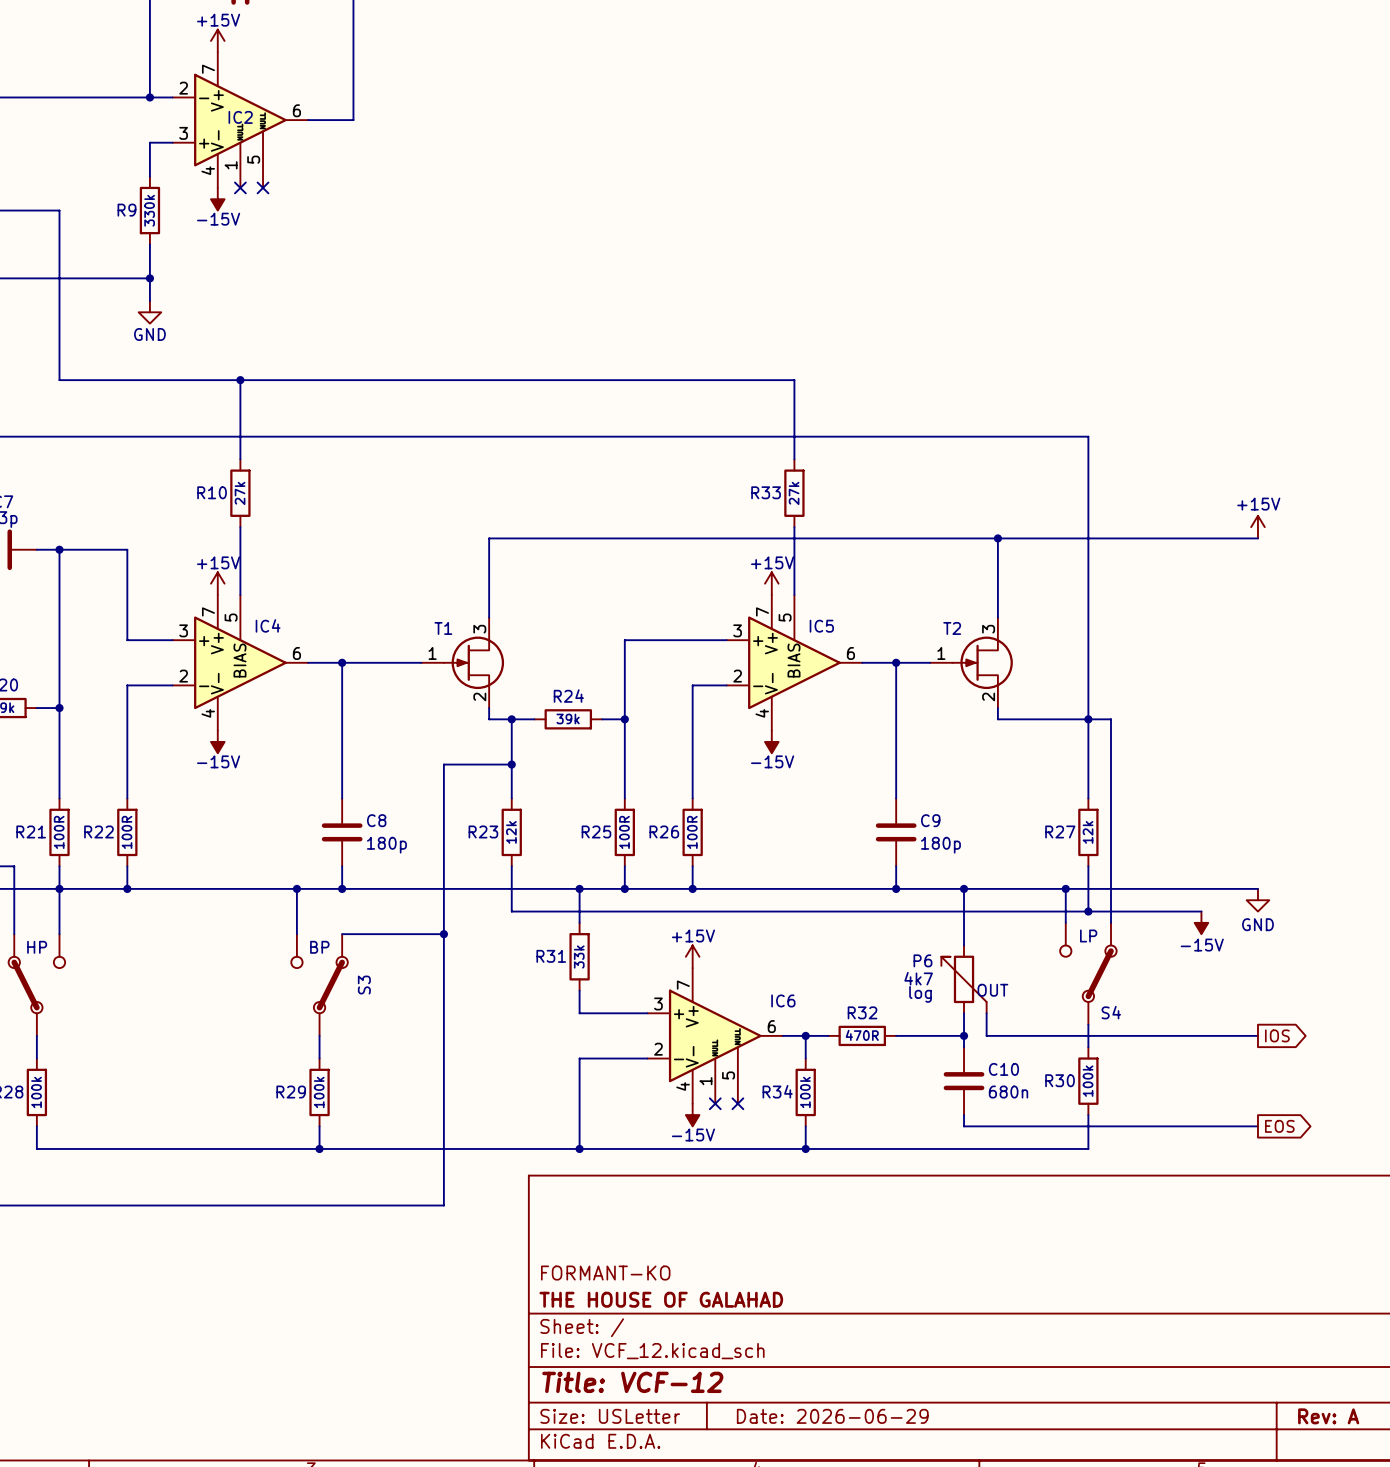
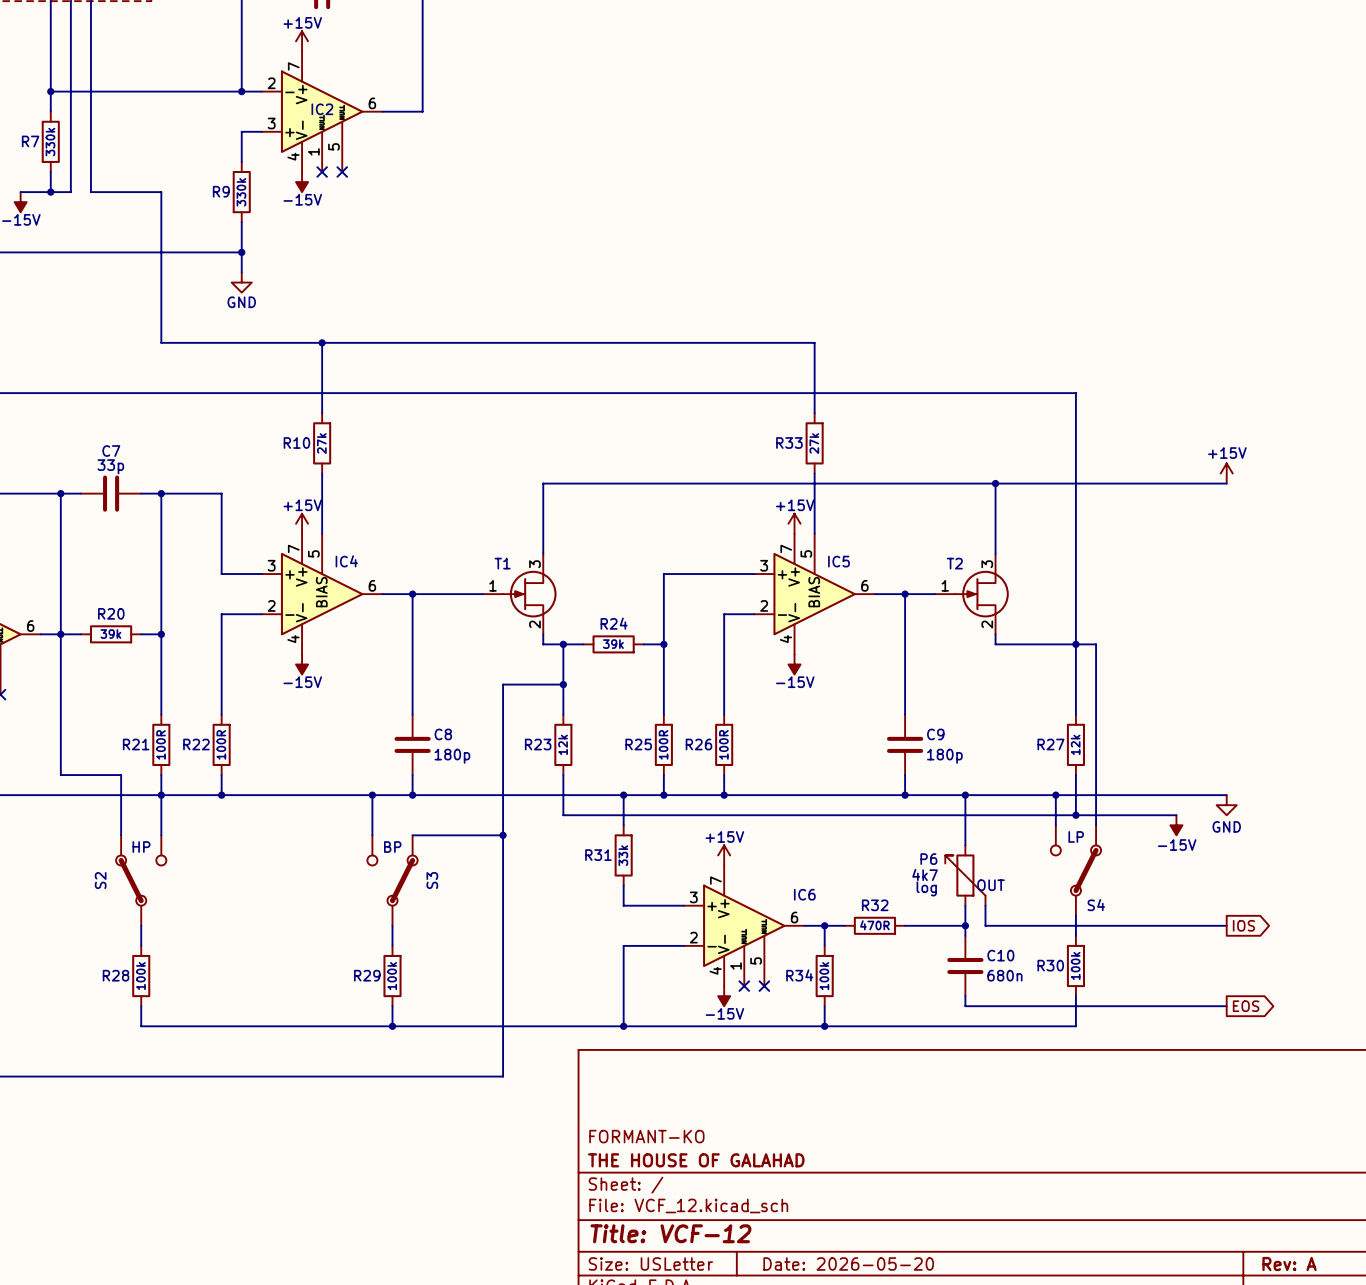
title block: Date: 2026-06-29 (832, 1416) -> Date: 2026-05-20 (848, 1263)

